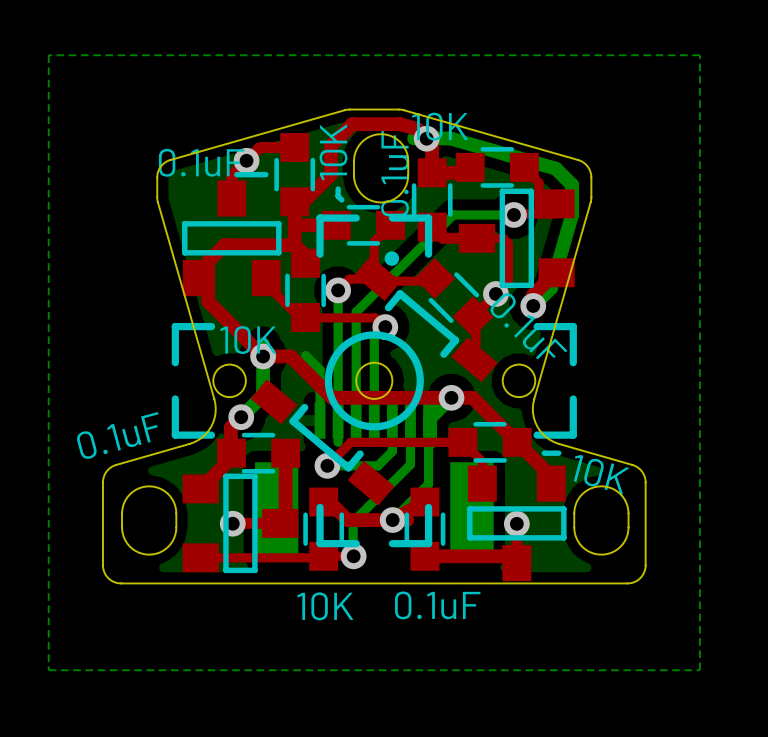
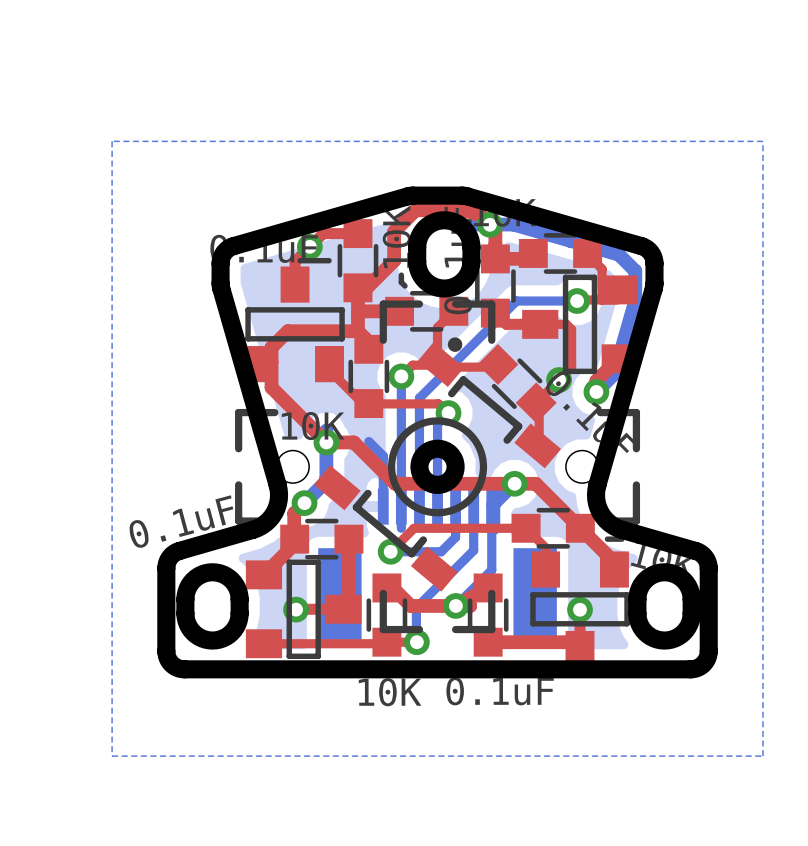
board edge width: thin (344, 110) (168, 160) (162, 164) (157, 172) (157, 202) -> thick (407, 196) (231, 246) (225, 250) (221, 258) (221, 288)
board edge width: thin (344, 110) (402, 109) (578, 160) (589, 168) (591, 177) (590, 201) (534, 399) (533, 413) (537, 426) (550, 440) (634, 465) (643, 473) (645, 482) (645, 565) (643, 574) (636, 581) (627, 583) (121, 583) (110, 579) (104, 572) (102, 565) (102, 482) (105, 473) (113, 465) (198, 440) (211, 426) (215, 413) (214, 399) (157, 202) -> thick (408, 196) (465, 196) (641, 246) (652, 254) (654, 263) (654, 287) (597, 485) (596, 499) (600, 512) (613, 526) (697, 551) (706, 559) (708, 568) (708, 651) (706, 660) (699, 666) (690, 669) (184, 669) (173, 665) (167, 658) (166, 651) (166, 568) (168, 559) (177, 551) (261, 526) (274, 512) (278, 499) (277, 485) (221, 288)
board edge width: thin (353, 161) (356, 185) (367, 198) (377, 202) (388, 201) (397, 196) (404, 188) (408, 178) (408, 157) (402, 144) (394, 137) (381, 134) (367, 137) (357, 147) (353, 161) -> thick (417, 247) (419, 271) (430, 284) (440, 288) (451, 287) (460, 282) (467, 274) (471, 264) (471, 243) (465, 230) (457, 223) (444, 220) (430, 223) (420, 233) (417, 247)
round board edge size: [356, 362, 393, 400] -> [410, 439, 465, 494]
board edge width: thin (122, 513) (124, 537) (135, 551) (145, 554) (156, 553) (165, 549) (172, 541) (176, 531) (176, 509) (172, 499) (162, 489) (149, 486) (135, 489) (125, 499) (122, 513) -> thick (185, 599) (187, 623) (198, 636) (208, 640) (219, 639) (229, 634) (236, 626) (239, 616) (239, 595) (236, 585) (226, 575) (212, 572) (198, 575) (189, 585) (185, 599)
board edge width: thin (574, 513) (576, 537) (587, 551) (597, 554) (608, 553) (617, 549) (624, 541) (628, 531) (628, 509) (624, 499) (614, 489) (601, 486) (587, 489) (577, 499) (574, 513) -> thick (637, 599) (639, 623) (650, 636) (660, 640) (671, 639) (681, 634) (688, 626) (691, 616) (691, 595) (688, 585) (678, 575) (664, 572) (650, 575) (641, 585) (637, 599)

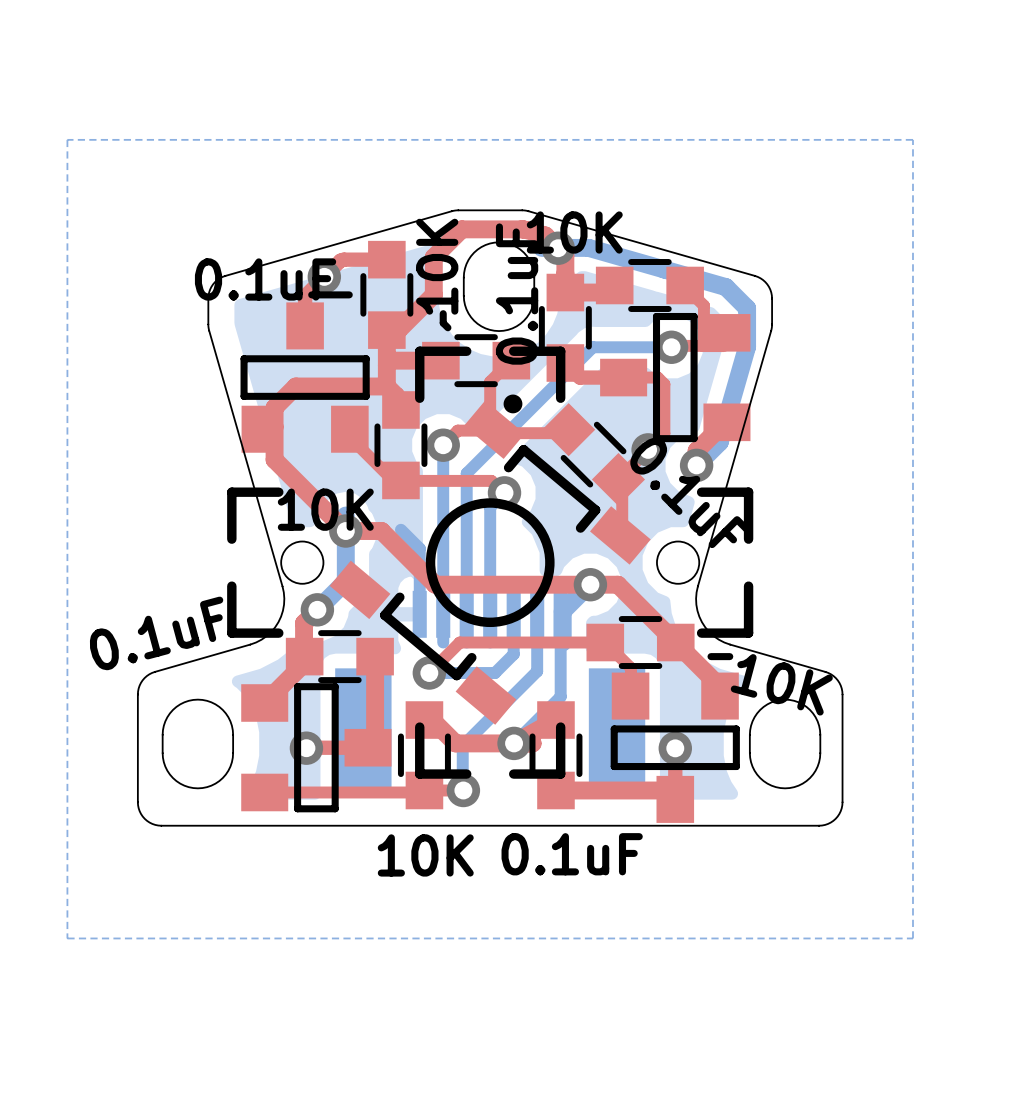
board edge width: thick (407, 196) (231, 246) (225, 250) (221, 258) (221, 288) -> thin (451, 211) (222, 276) (215, 282) (209, 292) (209, 330)
board edge width: thick (408, 196) (465, 196) (641, 246) (652, 254) (654, 263) (654, 287) (597, 485) (596, 499) (600, 512) (613, 526) (697, 551) (706, 559) (708, 568) (708, 651) (706, 660) (699, 666) (690, 669) (184, 669) (173, 665) (167, 658) (166, 651) (166, 568) (168, 559) (177, 551) (261, 526) (274, 512) (278, 499) (277, 485) (221, 288) -> thin (451, 211) (527, 210) (755, 275) (763, 280) (768, 286) (772, 298) (771, 329) (697, 586) (696, 604) (701, 622) (709, 632) (718, 639) (828, 672) (839, 682) (842, 694) (842, 802) (839, 813) (830, 822) (819, 825) (161, 825) (147, 820) (139, 811) (137, 802) (137, 694) (140, 682) (152, 672) (261, 639) (271, 632) (278, 622) (284, 604) (282, 586) (209, 330)
board edge width: thick (417, 247) (419, 271) (430, 284) (440, 288) (451, 287) (460, 282) (467, 274) (471, 264) (471, 243) (465, 230) (457, 223) (444, 220) (430, 223) (420, 233) (417, 247) -> thin (463, 277) (464, 300) (466, 309) (474, 320) (481, 326) (494, 330) (508, 329) (520, 323) (529, 313) (533, 300) (533, 272) (526, 256) (516, 247) (499, 242) (481, 247) (468, 259) (463, 277)
round board edge: [410, 439, 465, 494] -> none
board edge width: thick (185, 599) (187, 623) (198, 636) (208, 640) (219, 639) (229, 634) (236, 626) (239, 616) (239, 595) (236, 585) (226, 575) (212, 572) (198, 575) (189, 585) (185, 599) -> thin (162, 734) (162, 757) (165, 766) (172, 778) (180, 783) (193, 788) (207, 787) (219, 781) (228, 770) (232, 757) (232, 730) (228, 717) (215, 704) (197, 699) (180, 704) (167, 717) (162, 734)
board edge width: thick (637, 599) (639, 623) (650, 636) (660, 640) (671, 639) (681, 634) (688, 626) (691, 616) (691, 595) (688, 585) (678, 575) (664, 572) (650, 575) (641, 585) (637, 599) -> thin (749, 734) (750, 757) (752, 766) (760, 778) (767, 783) (780, 788) (794, 787) (806, 781) (815, 770) (820, 757) (820, 730) (815, 717) (802, 704) (785, 699) (767, 704) (754, 717) (749, 734)

